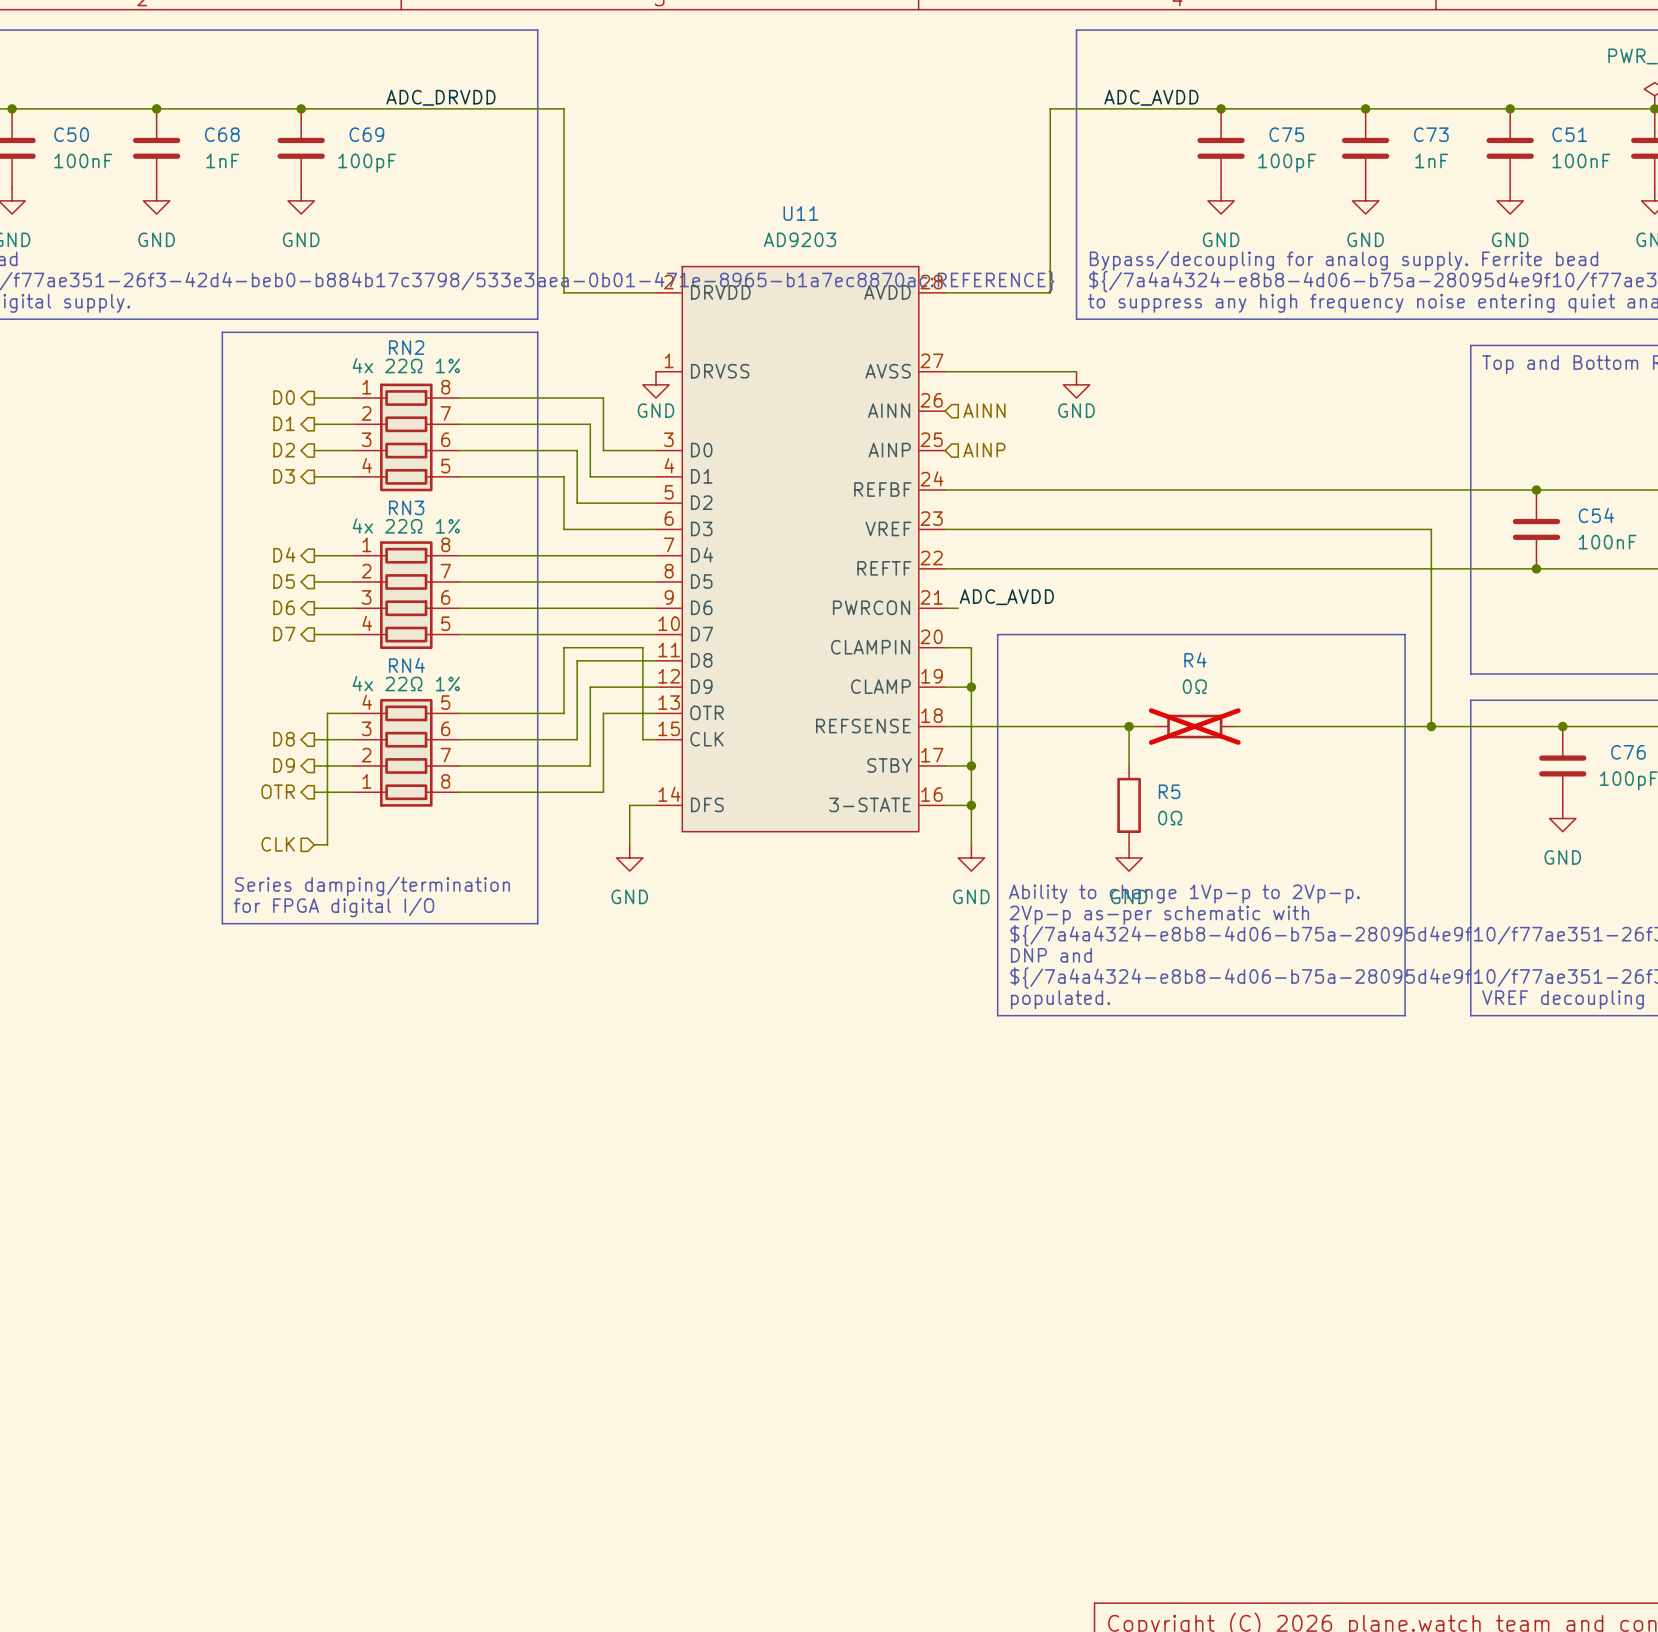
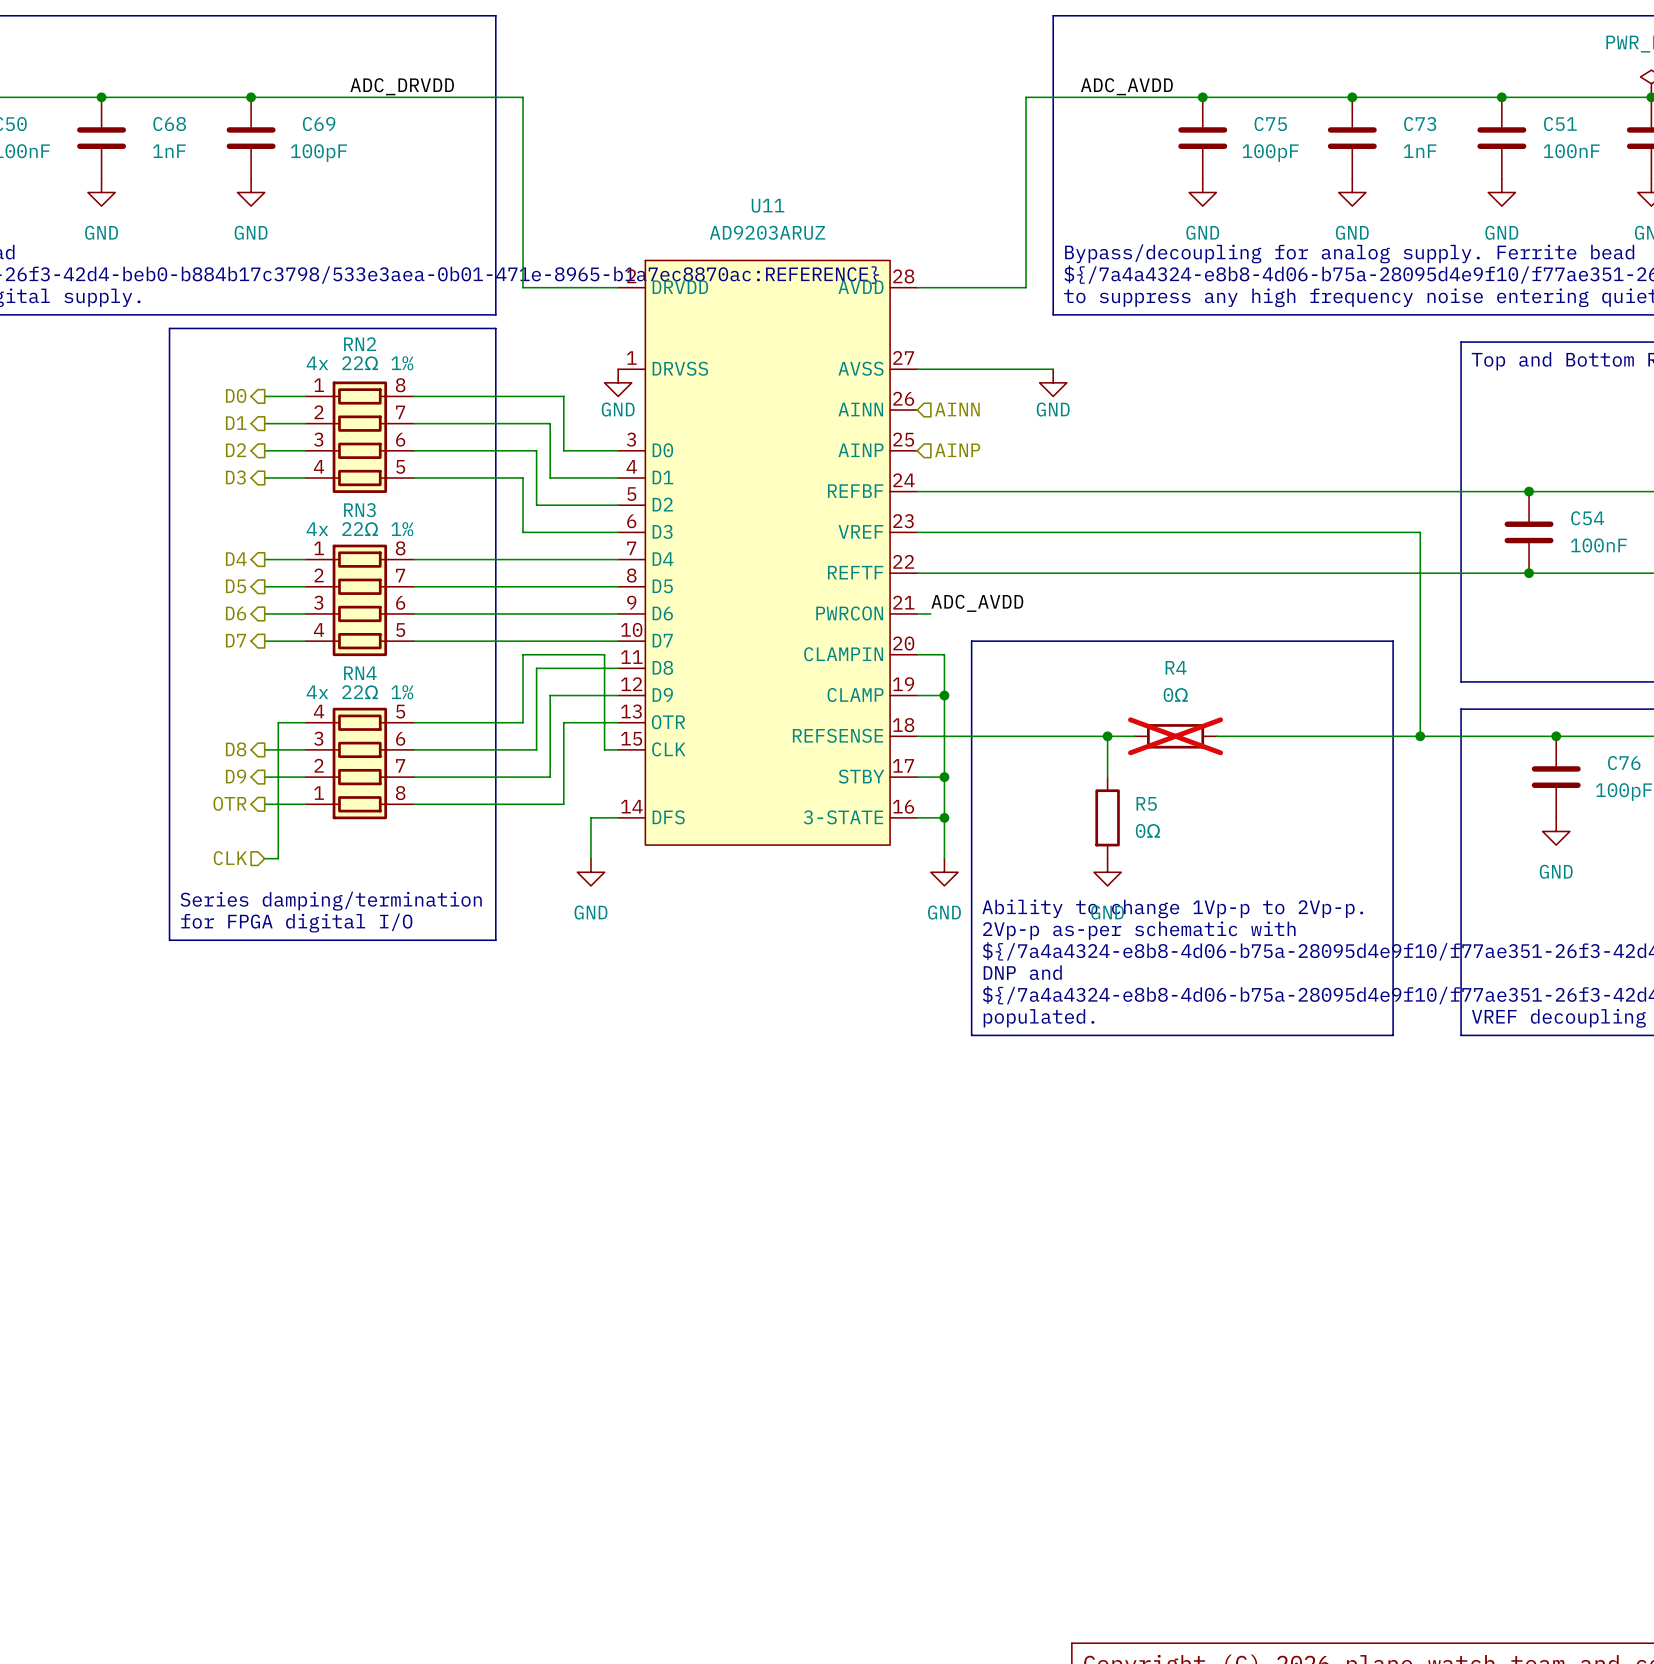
U11 value: AD9203 (799, 239) -> AD9203ARUZ (767, 232)

